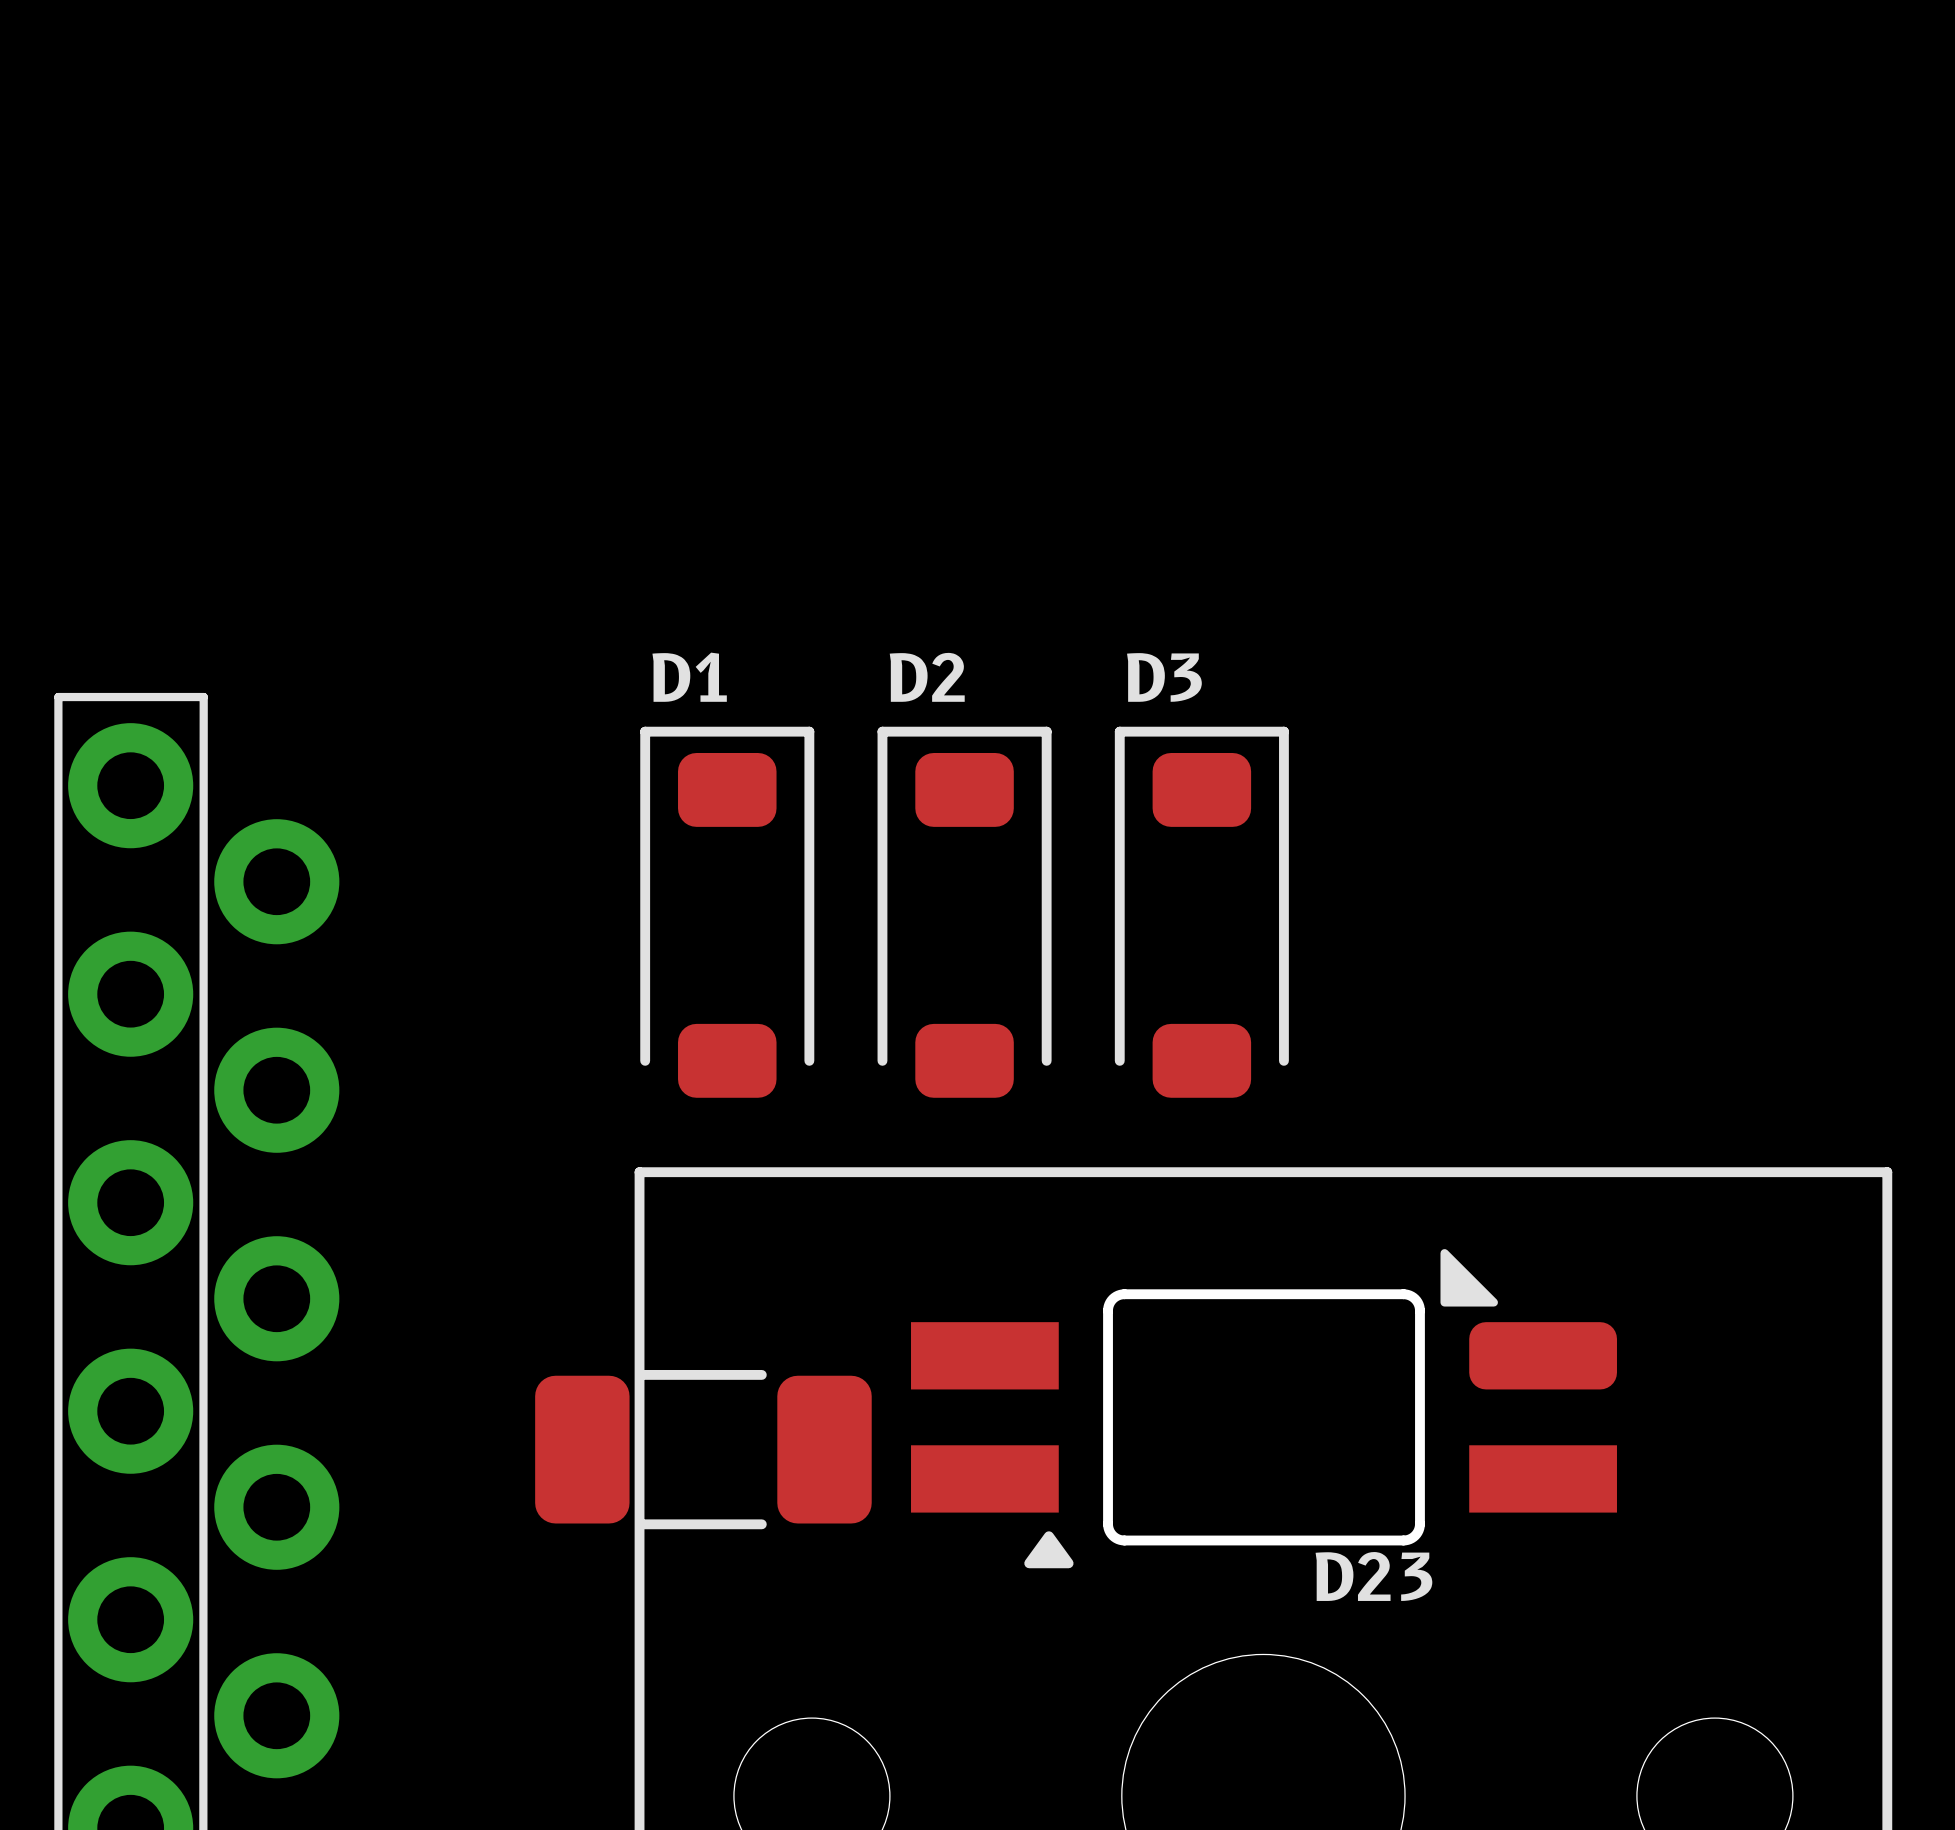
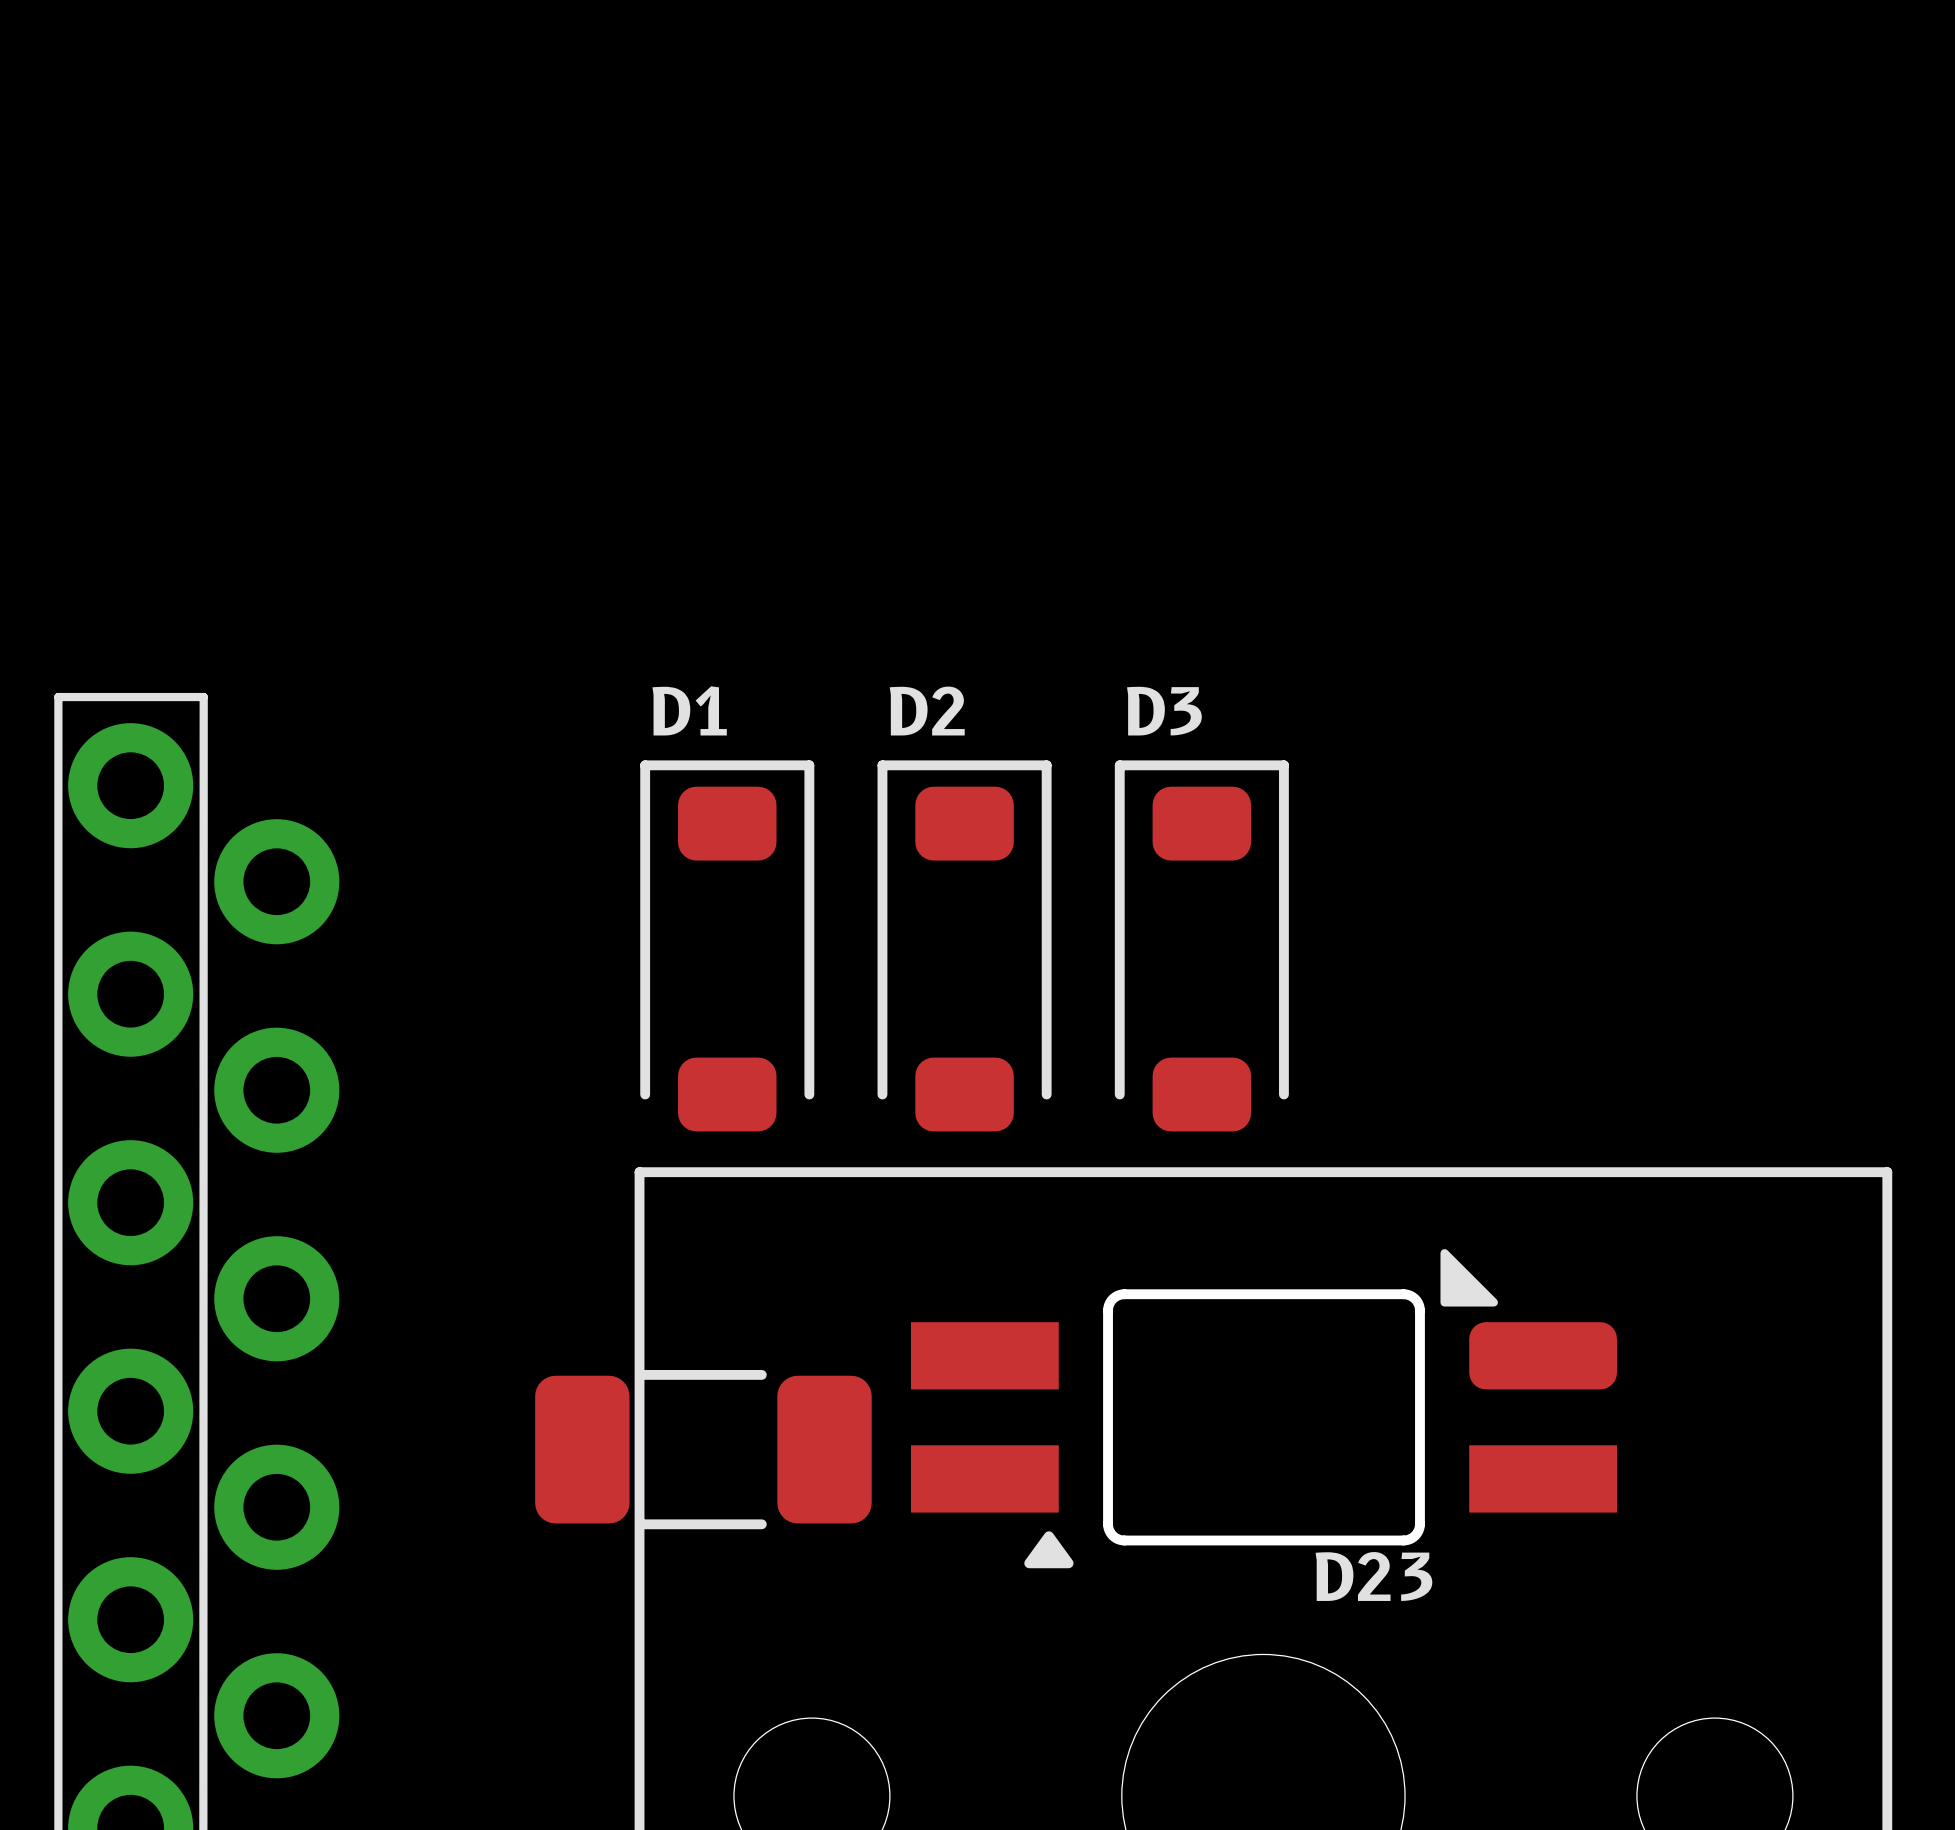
D1 position: (727, 912) -> (727, 945)
D2 position: (964, 912) -> (964, 945)
D3 position: (1201, 912) -> (1201, 945)

